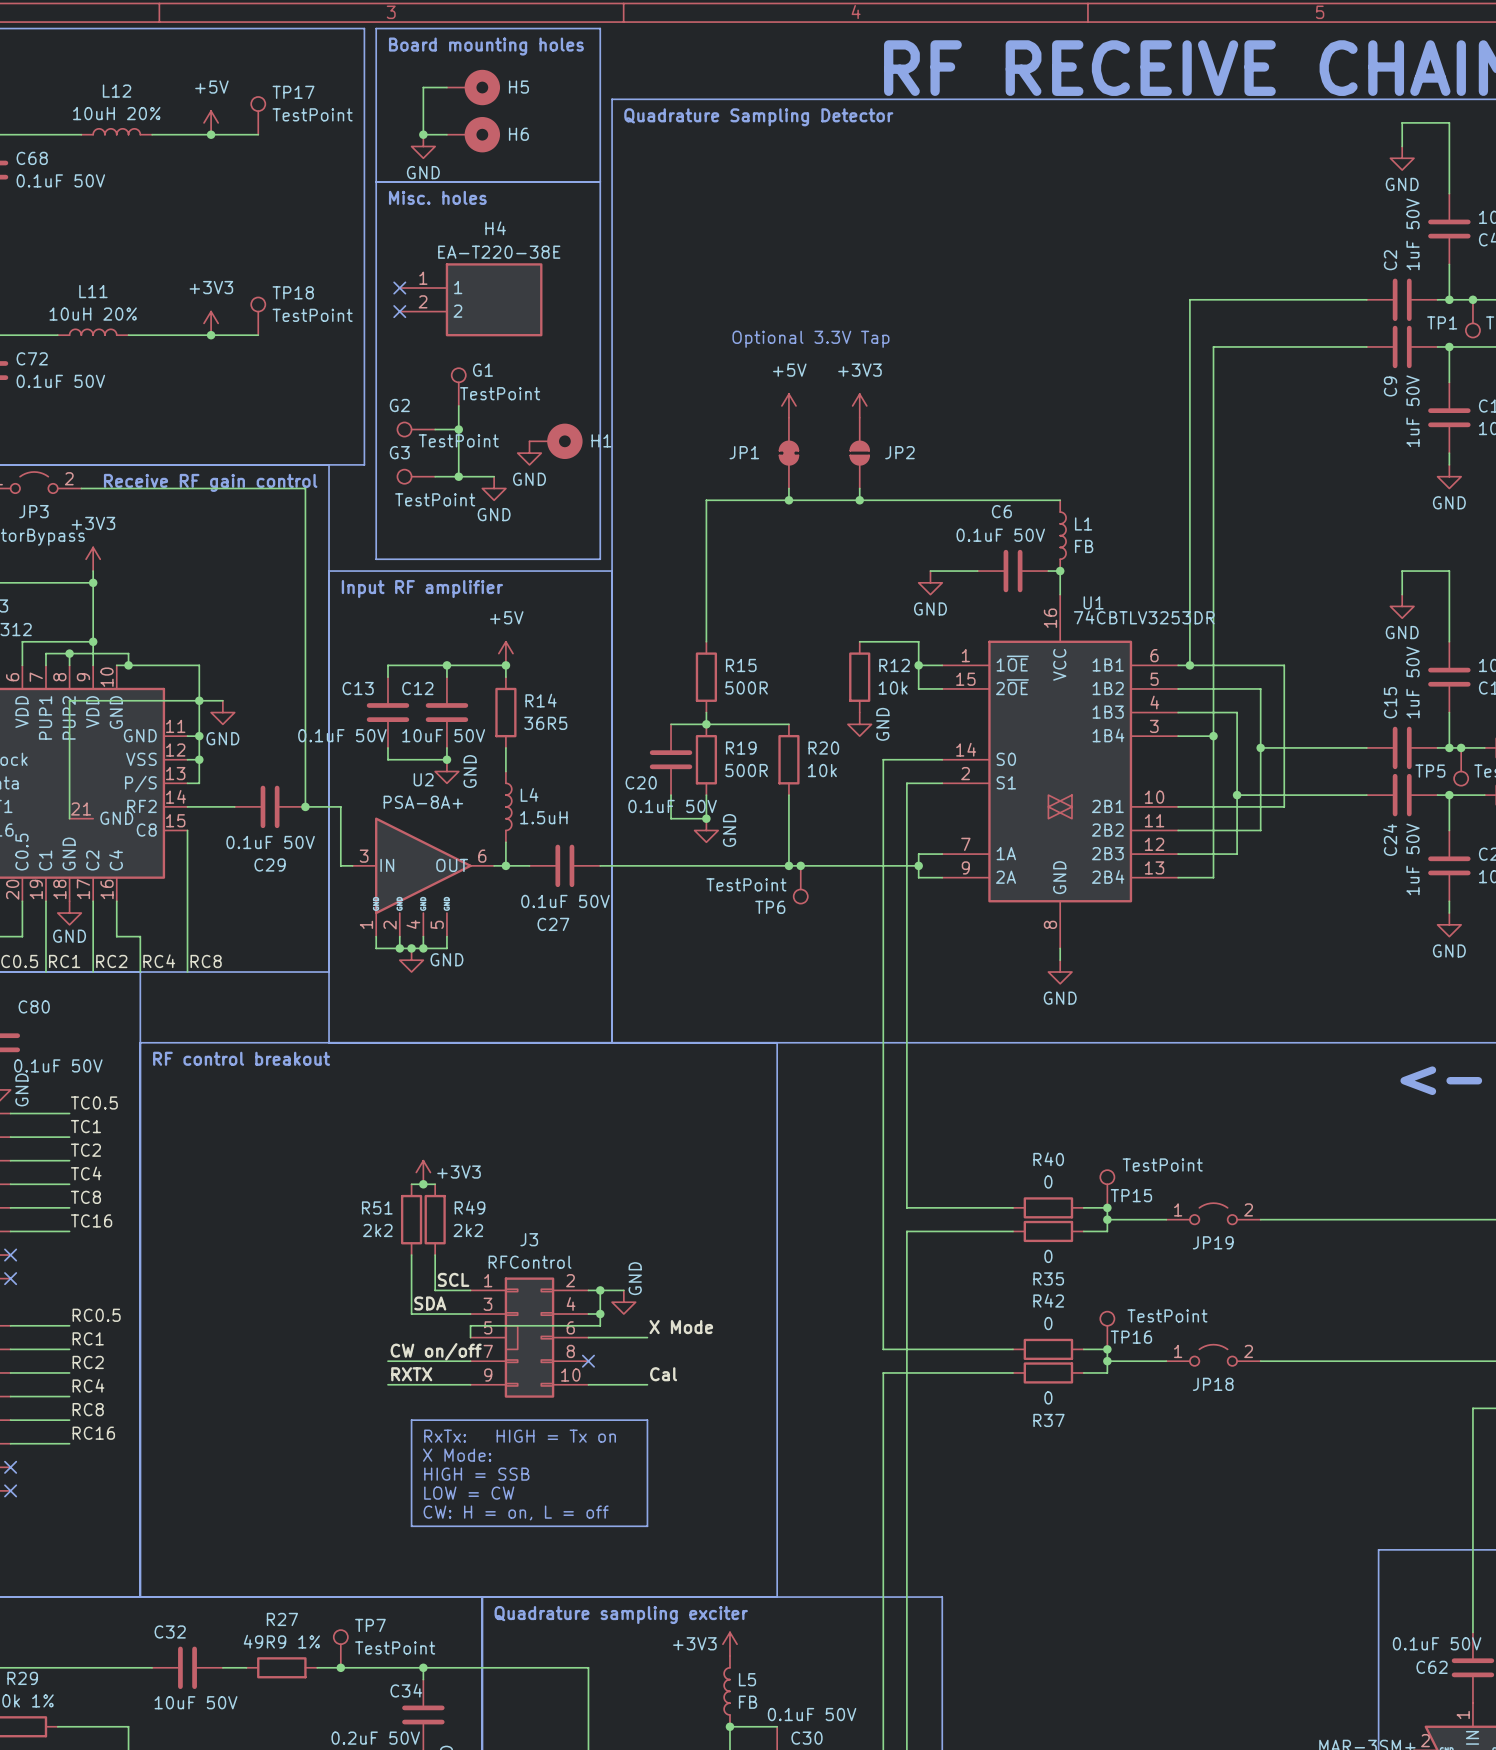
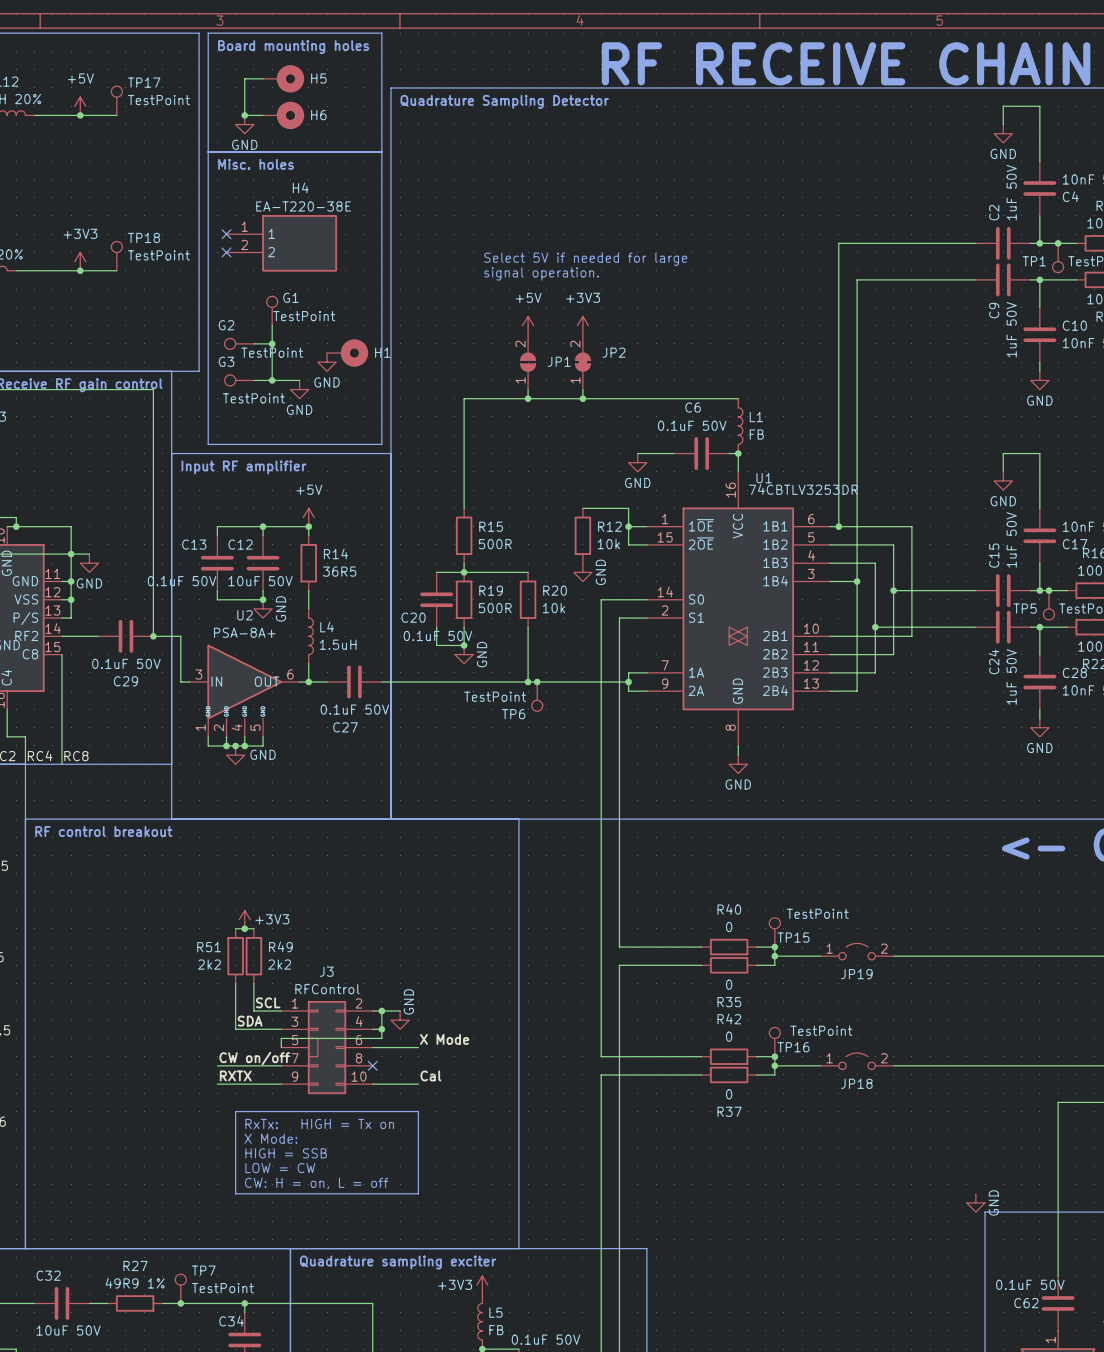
text: none -> Select 5V if needed for large (585, 259)
text: Optional 3.3V Tap (810, 339) -> signal operation. (541, 273)
JP1 symbol: [779, 417, 799, 489] -> [520, 334, 536, 390]
JP2 symbol: [850, 417, 870, 489] -> [575, 334, 591, 390]
JP1 name position: JP1 (744, 452) -> JP1 (559, 361)
power symbol: none -> GND (975, 1202)

